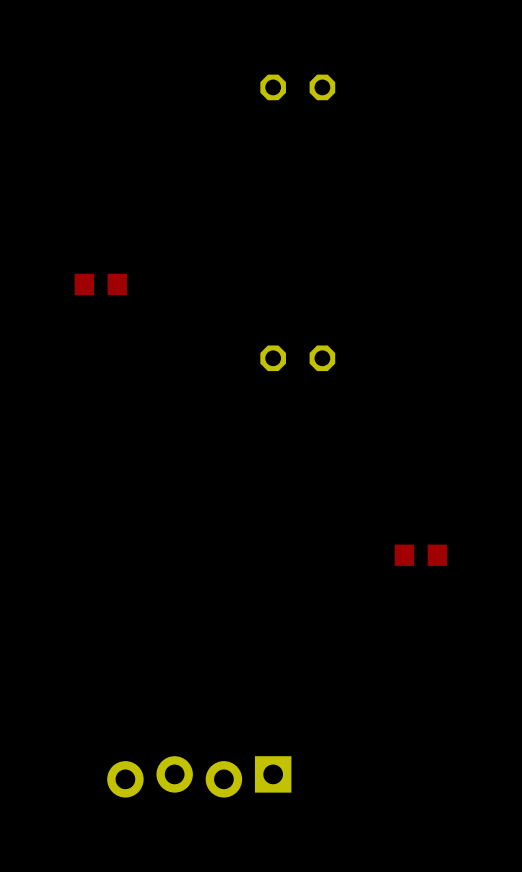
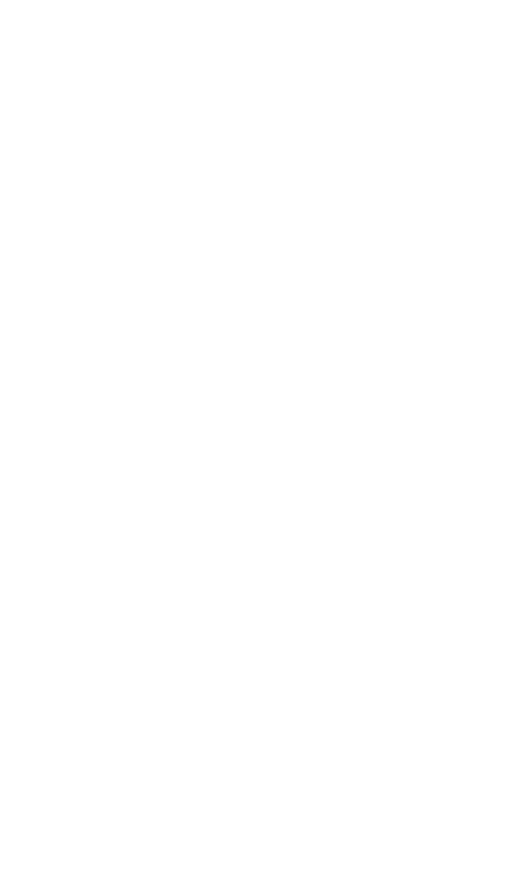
part: (297, 87) -> none
part: (100, 284) -> none
part: (297, 358) -> none
part: (420, 555) -> none
part: (199, 776) -> none

